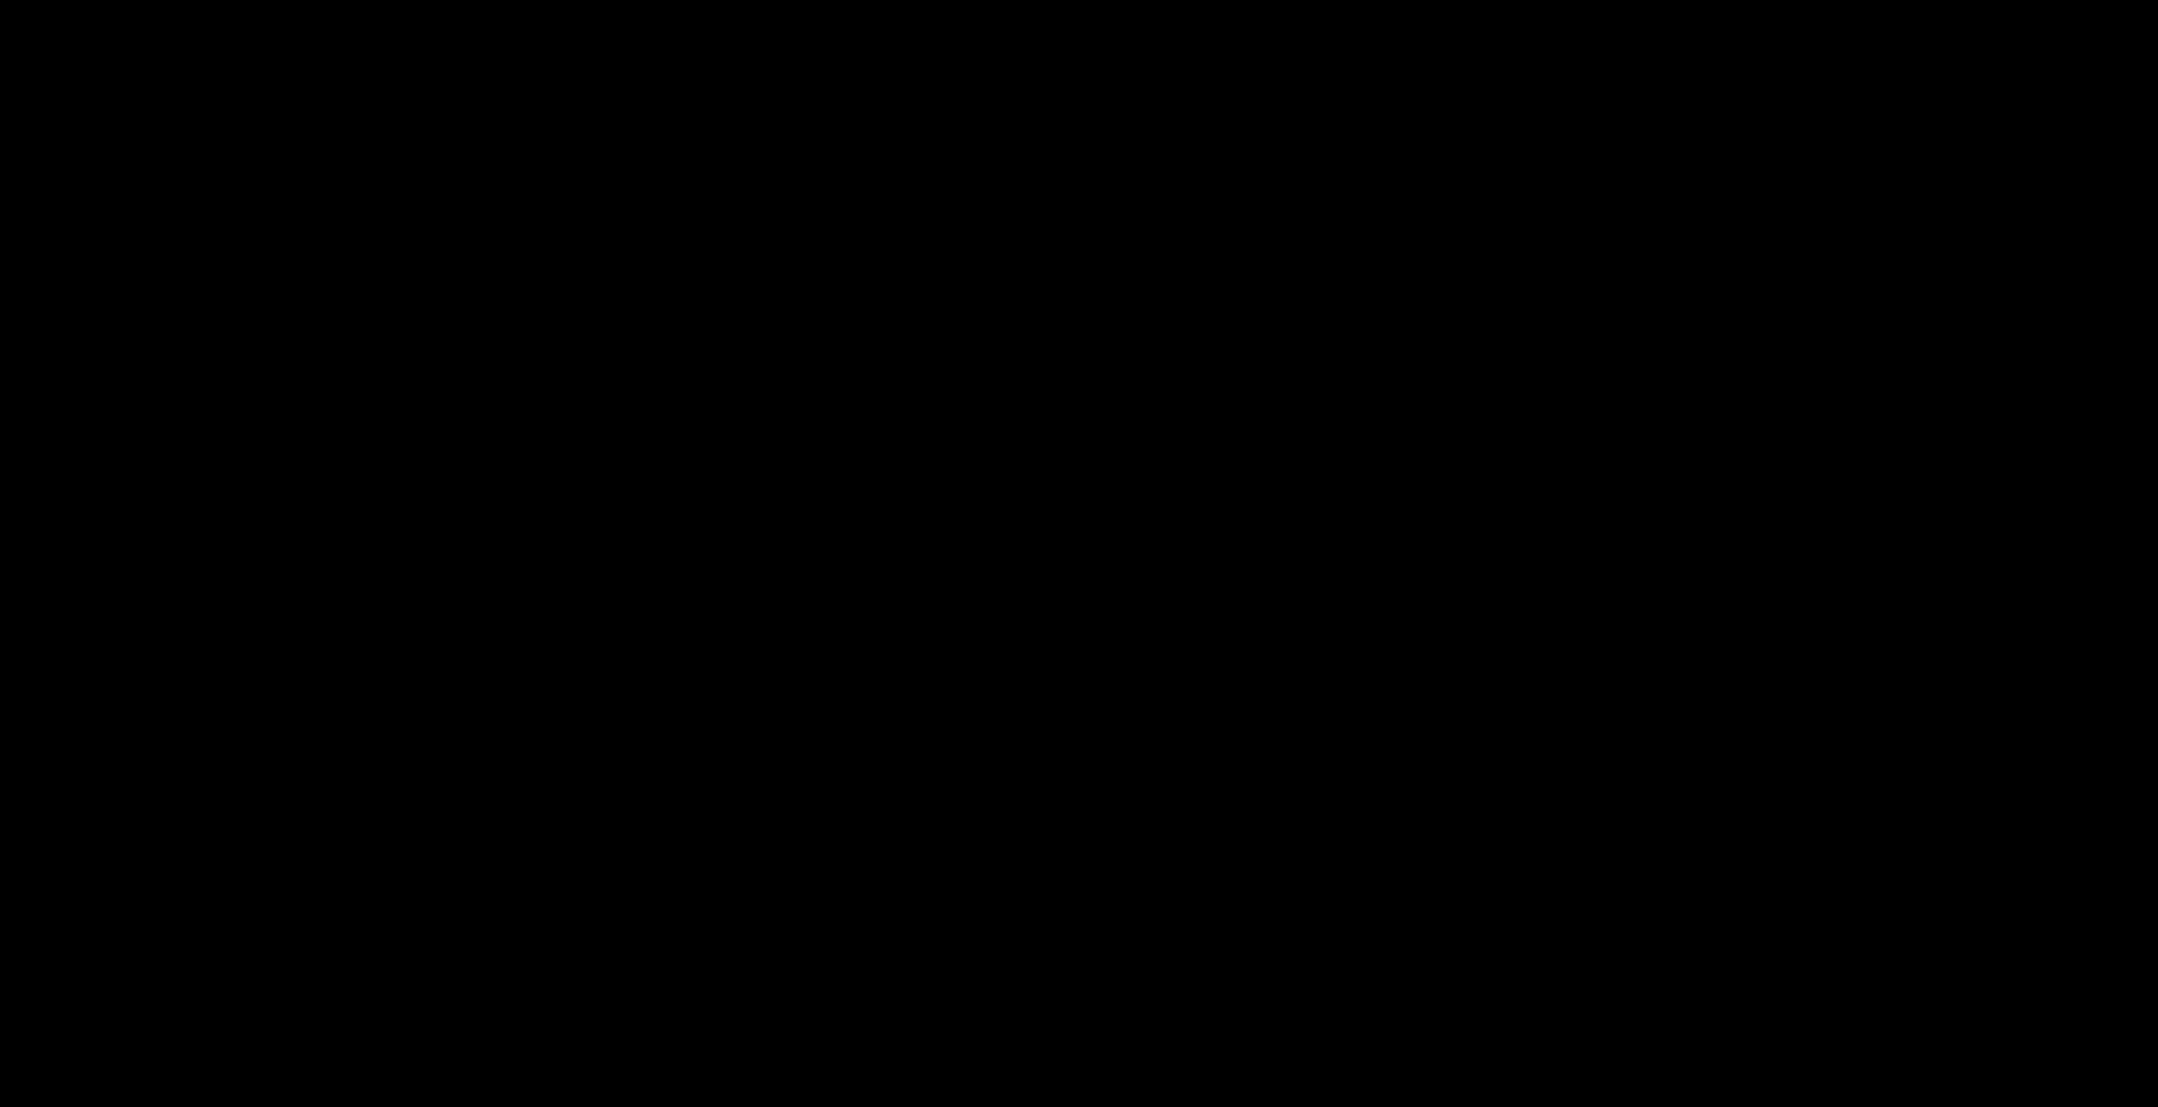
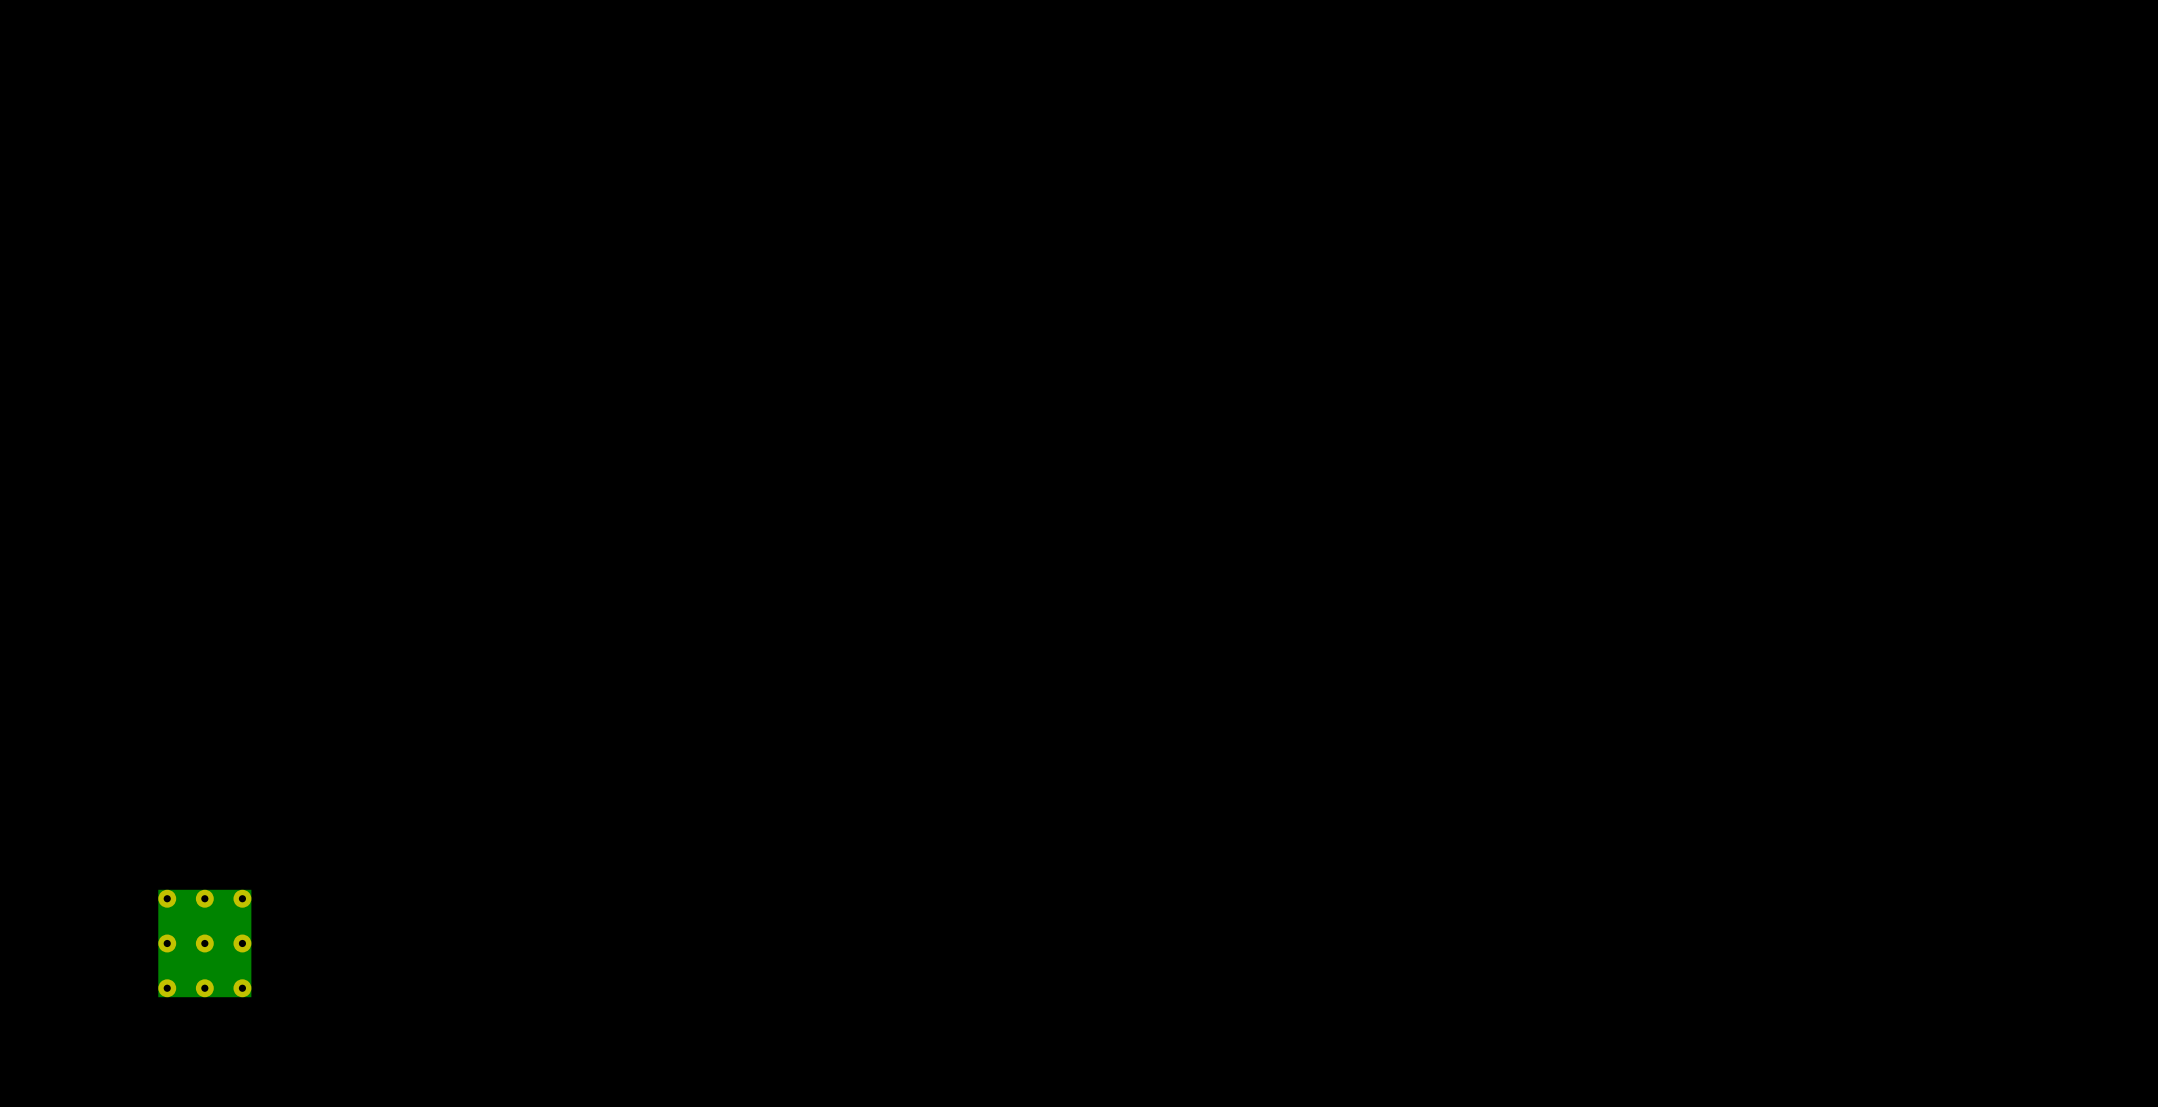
part: none -> (204, 943)

